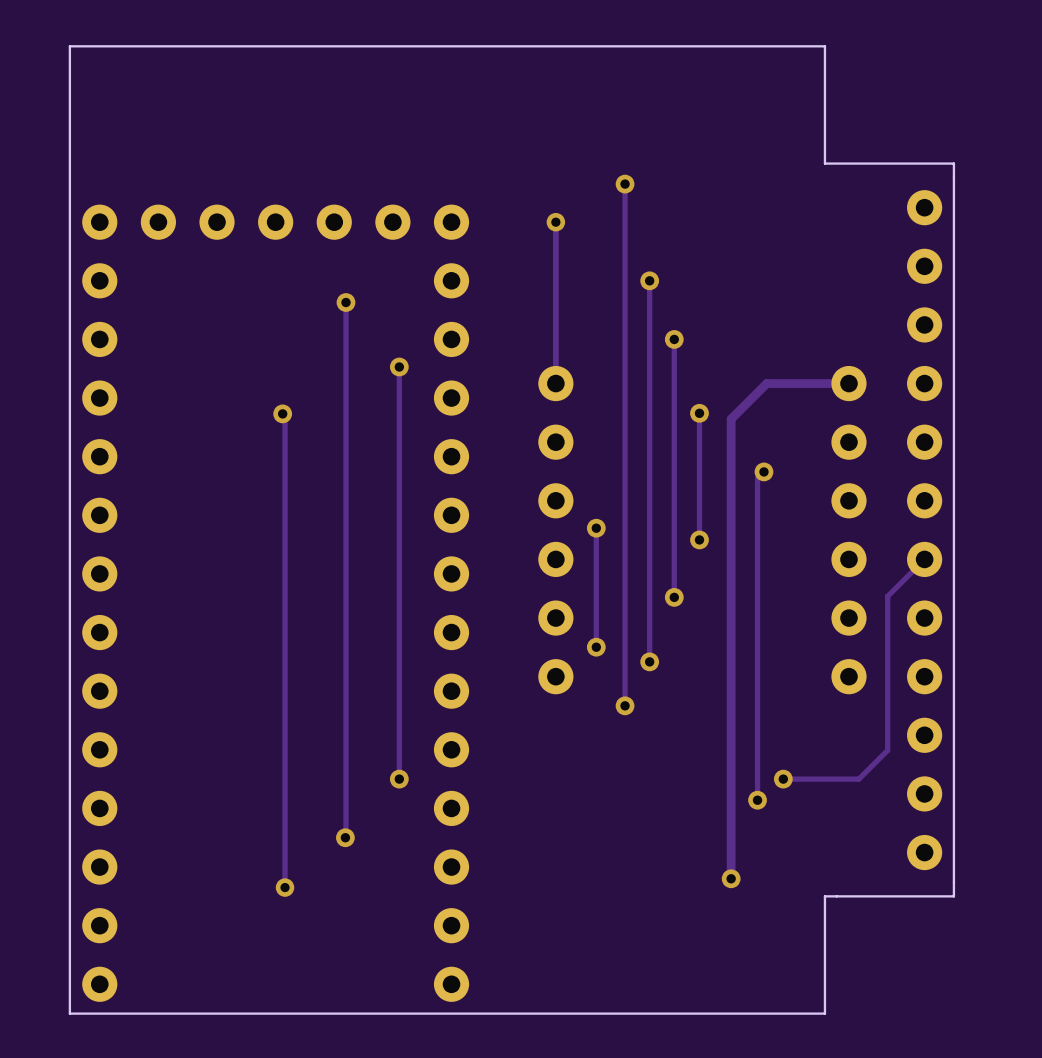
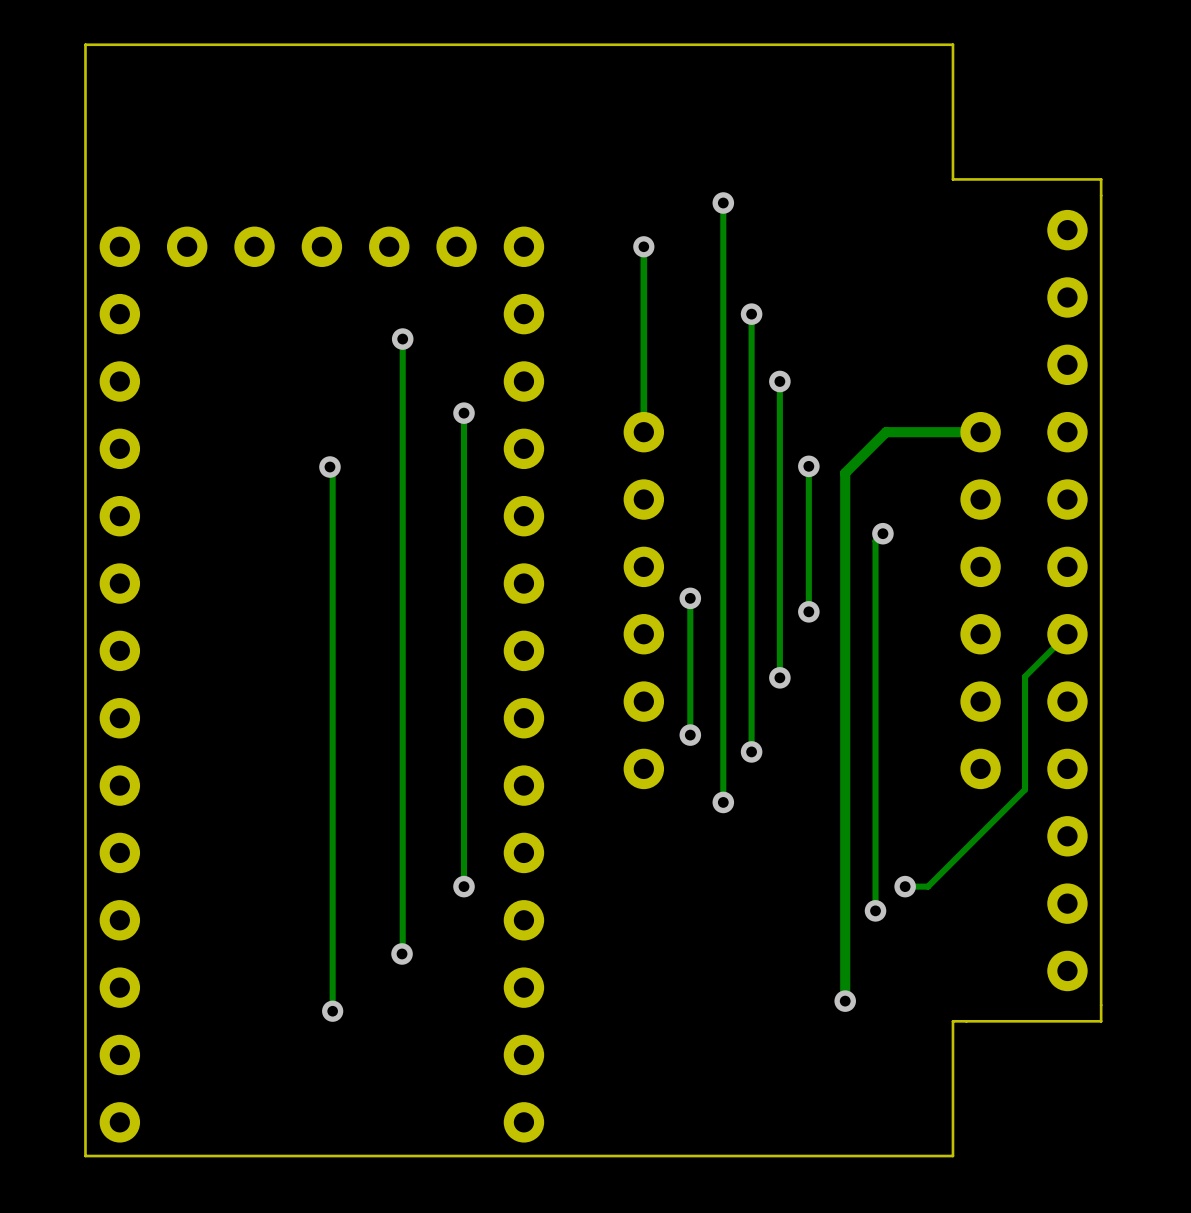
track: (887, 694) (887, 750) (858, 779) (803, 779) -> (1025, 789) (928, 886)

